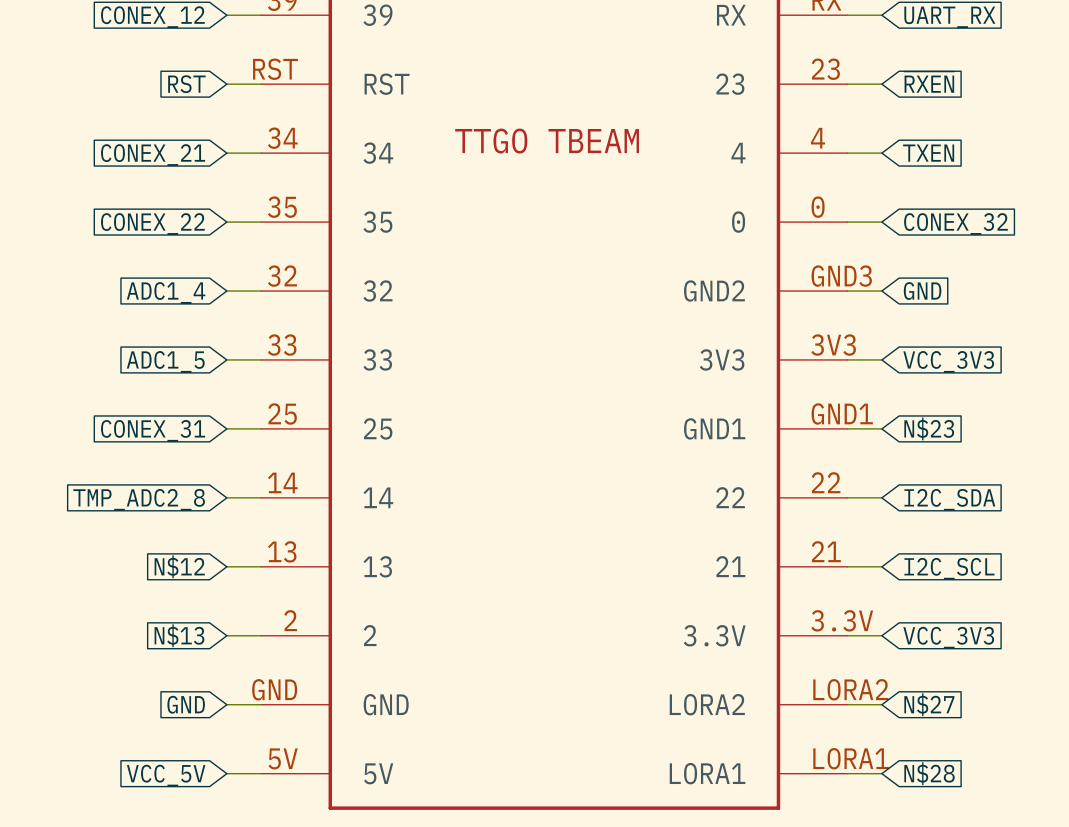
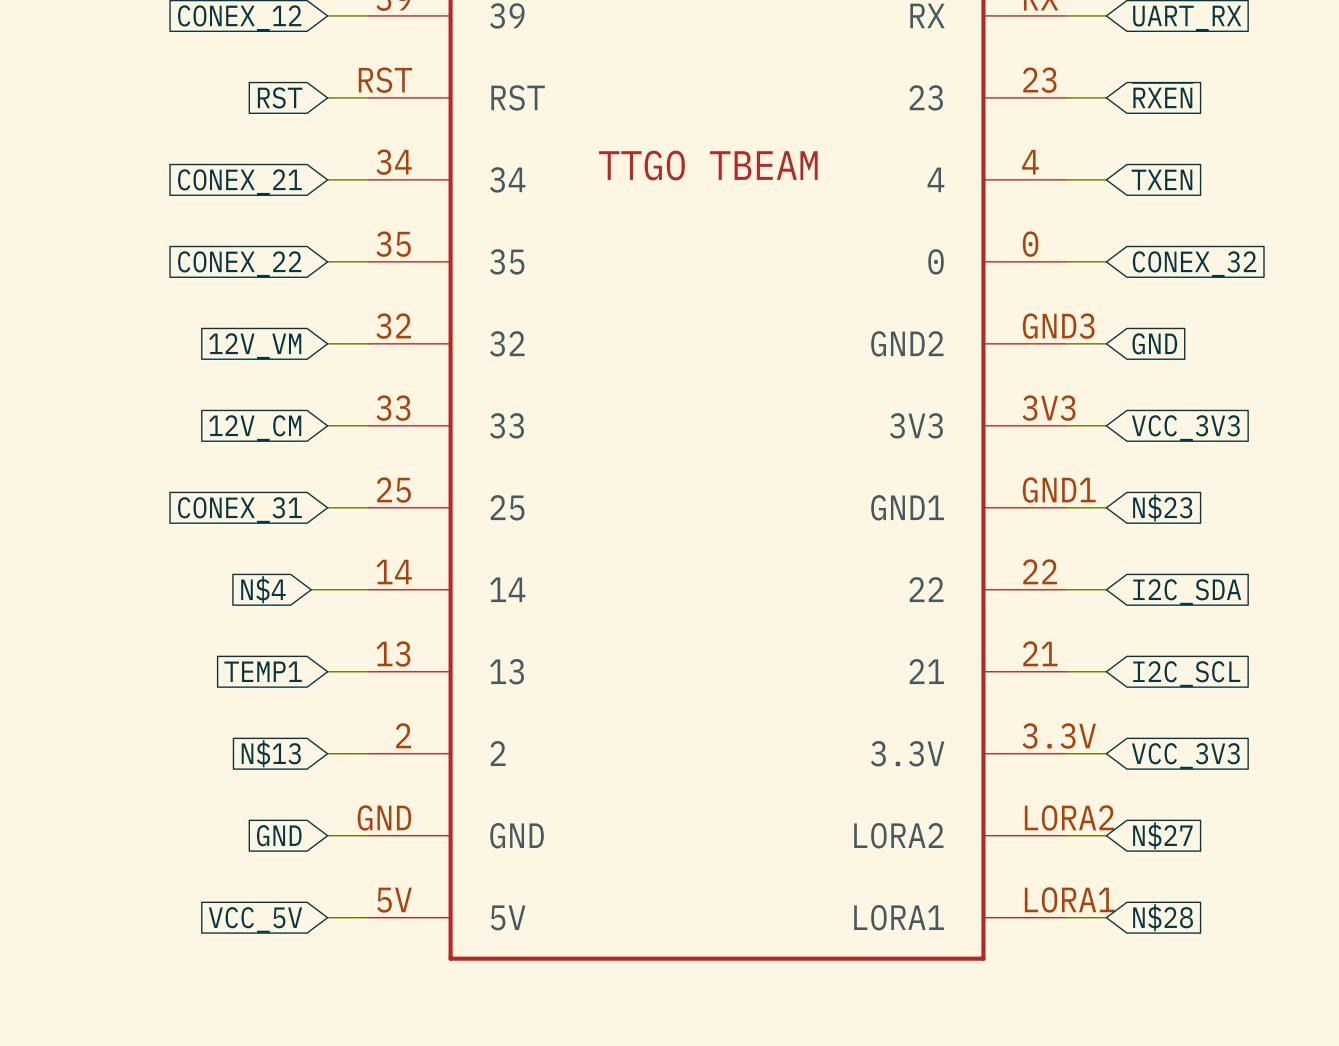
global label: ADC1_4 (166, 292) -> 12V_VM (255, 346)
global label: ADC1_5 (165, 361) -> 12V_CM (255, 428)
global label: none -> N$4 (263, 589)
wire: none -> (311, 589) (327, 589)
global label: TMP_ADC2_8 (139, 499) -> none
global label: N$12 (179, 566) -> TEMP1 (263, 671)

